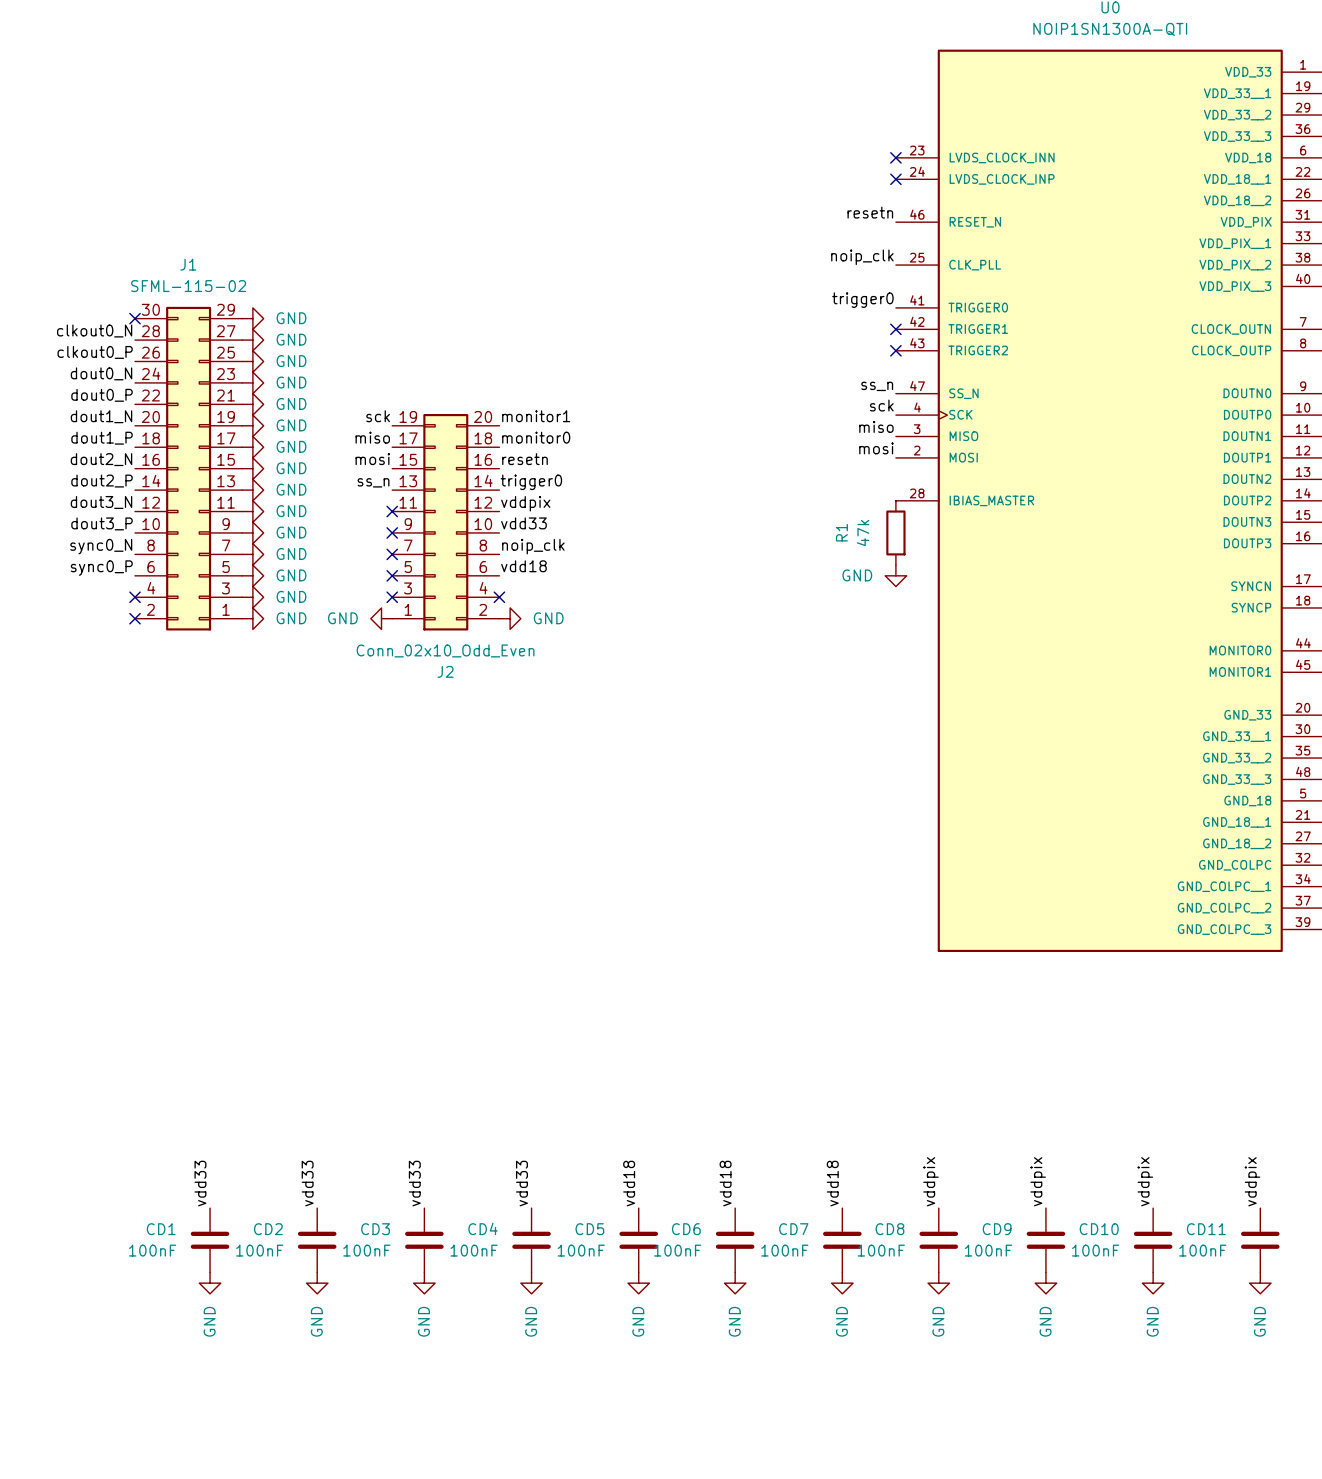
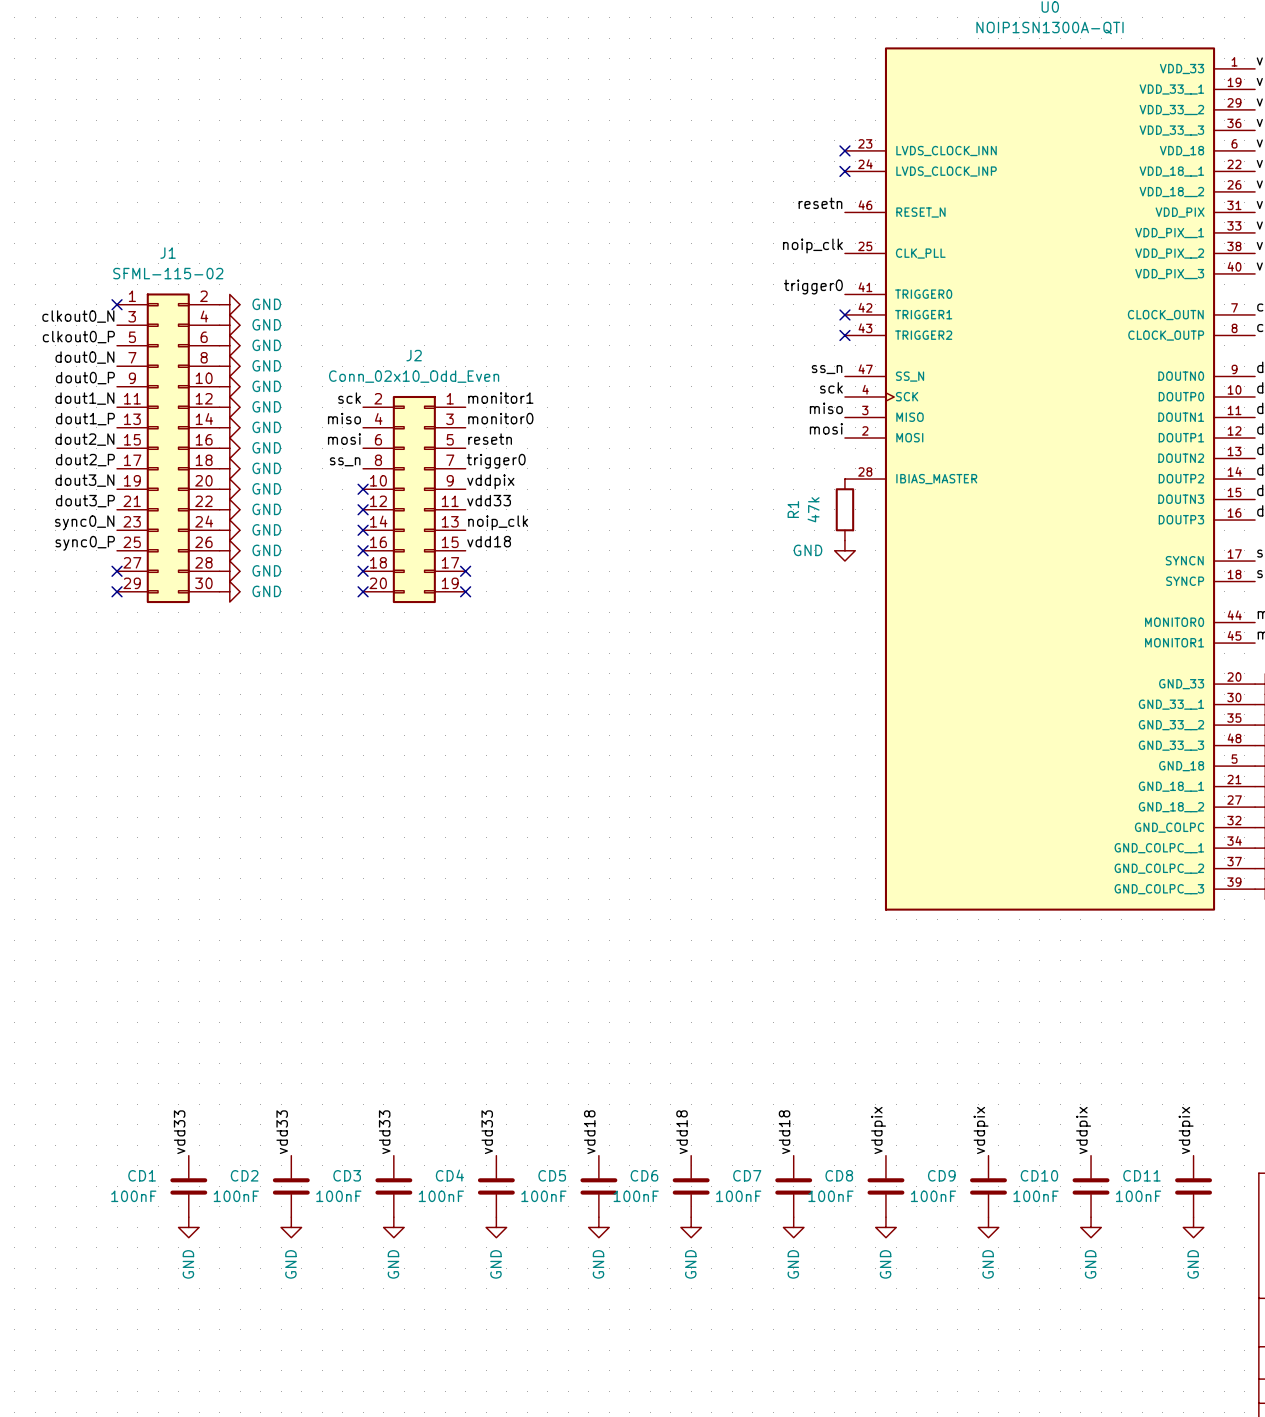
J1 rotation: 0° (188, 468) -> 180° (168, 448)
J2 rotation: 0° (445, 522) -> 180° (414, 499)
power symbol: GND (381, 618) -> none
no-connect mark: none -> (363, 591)
no-connect mark: none -> (465, 591)
power symbol: GND (510, 618) -> none

